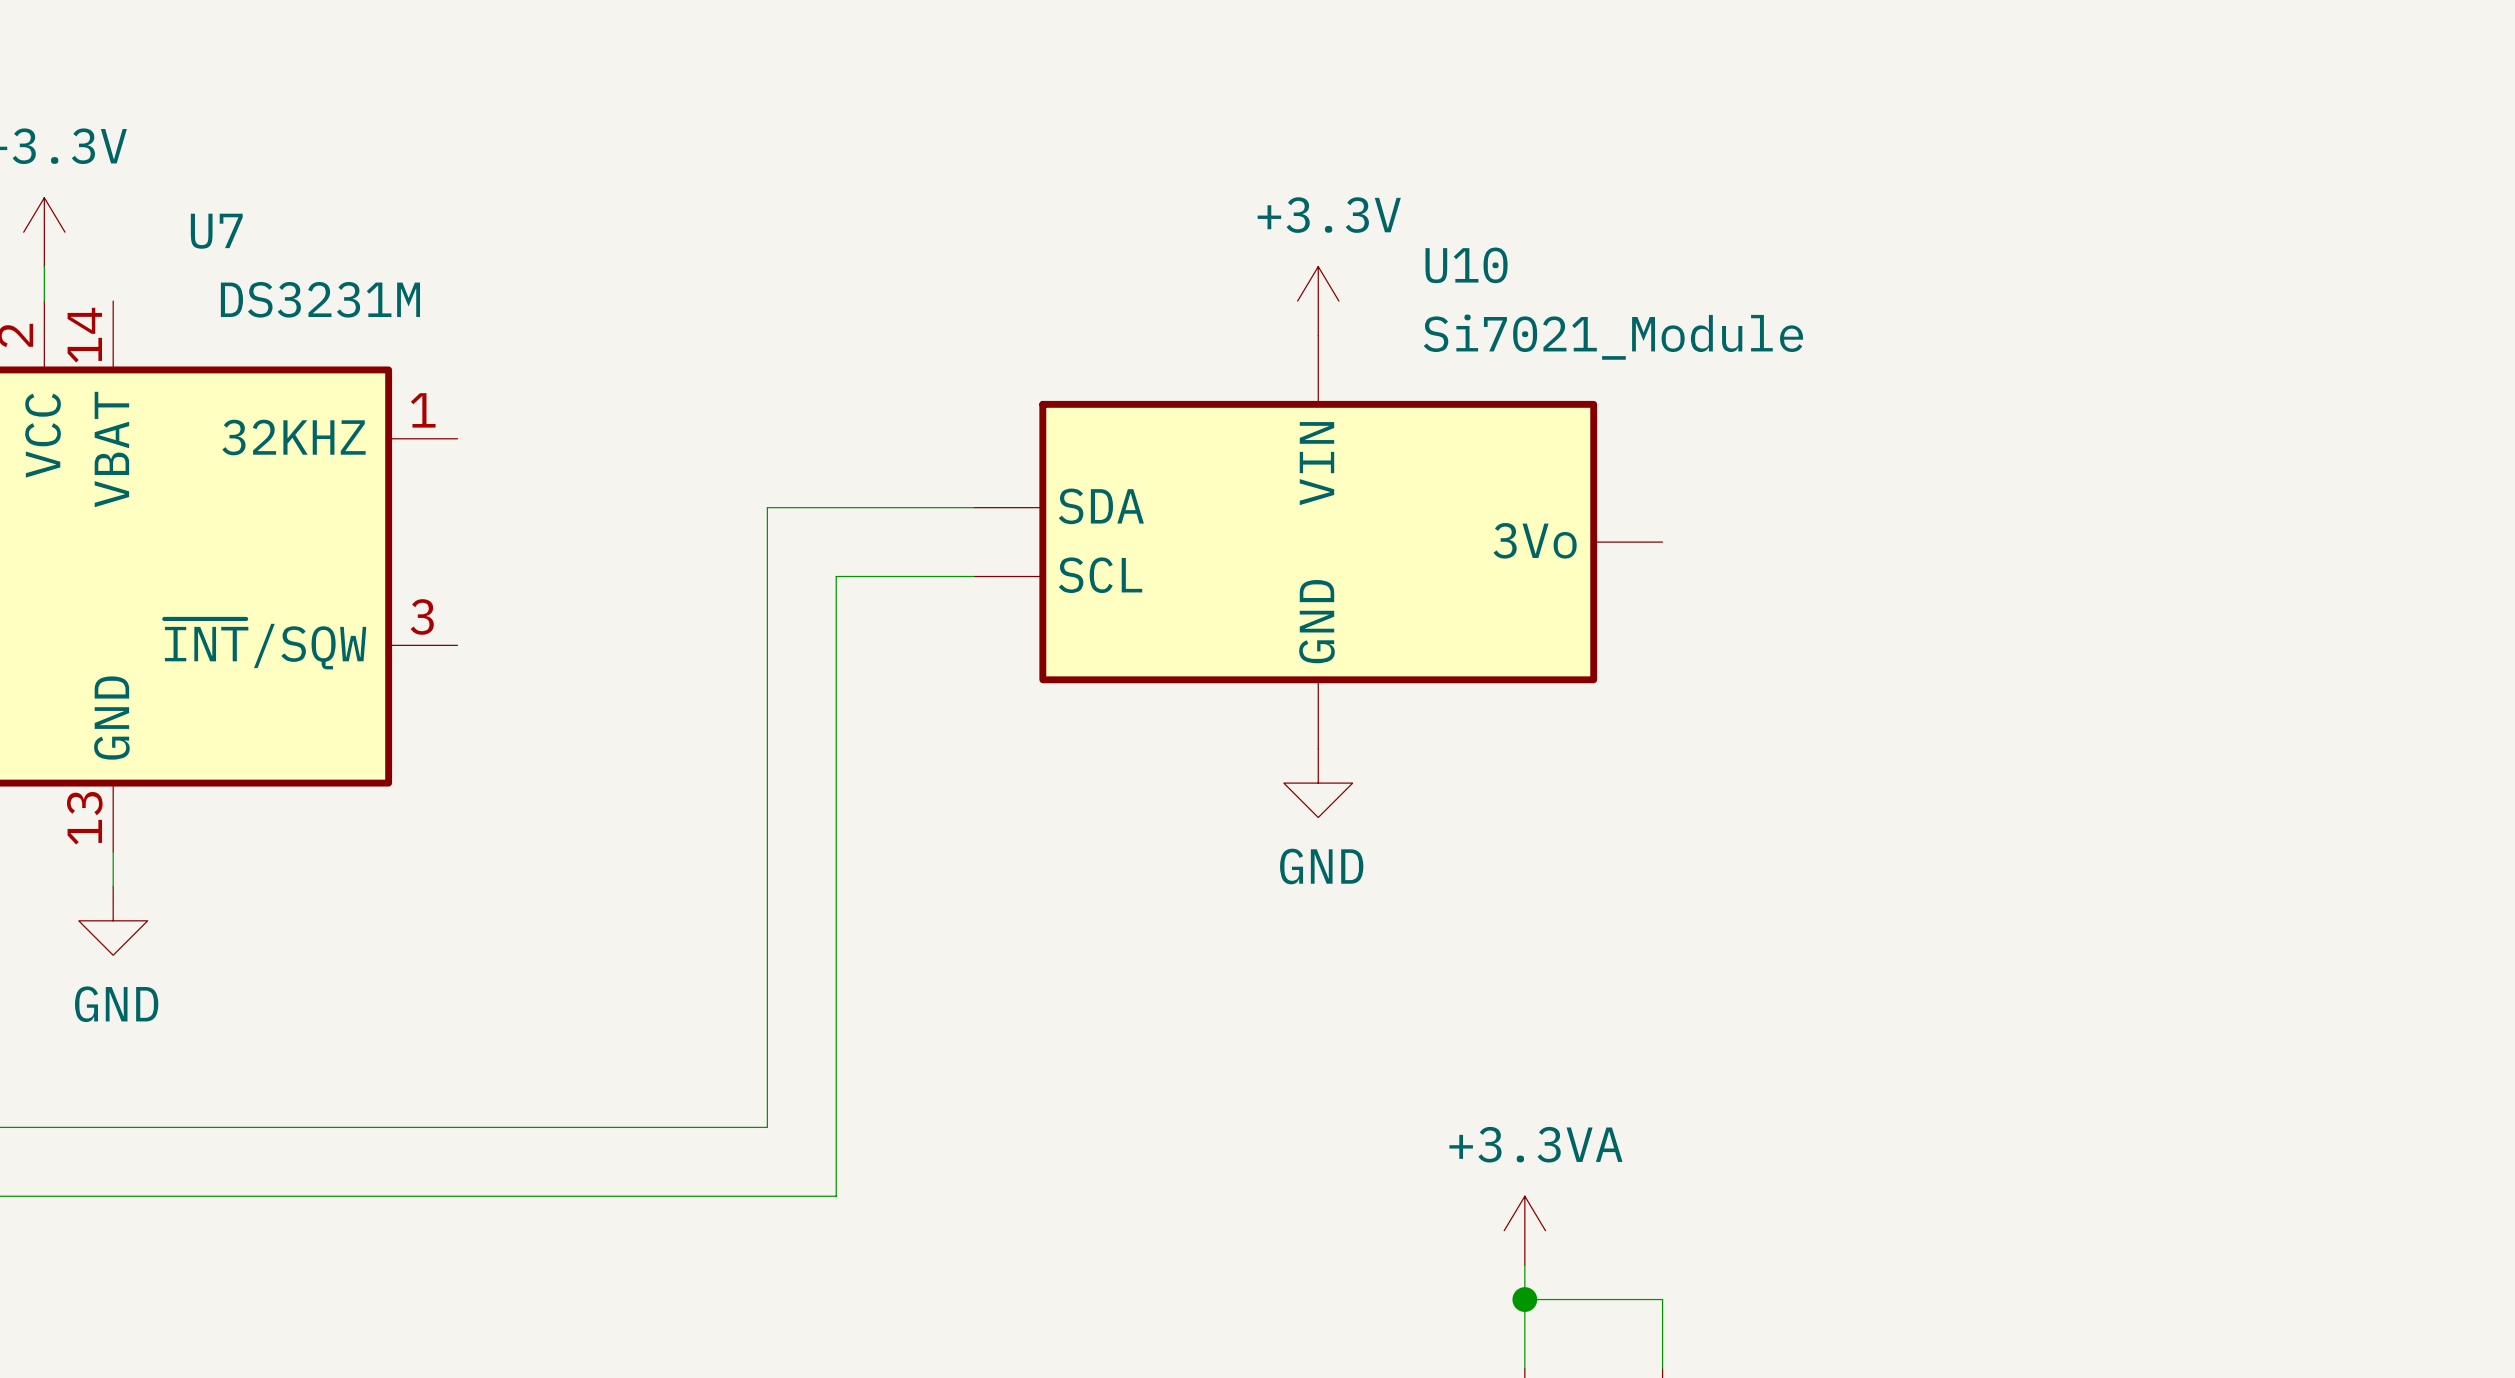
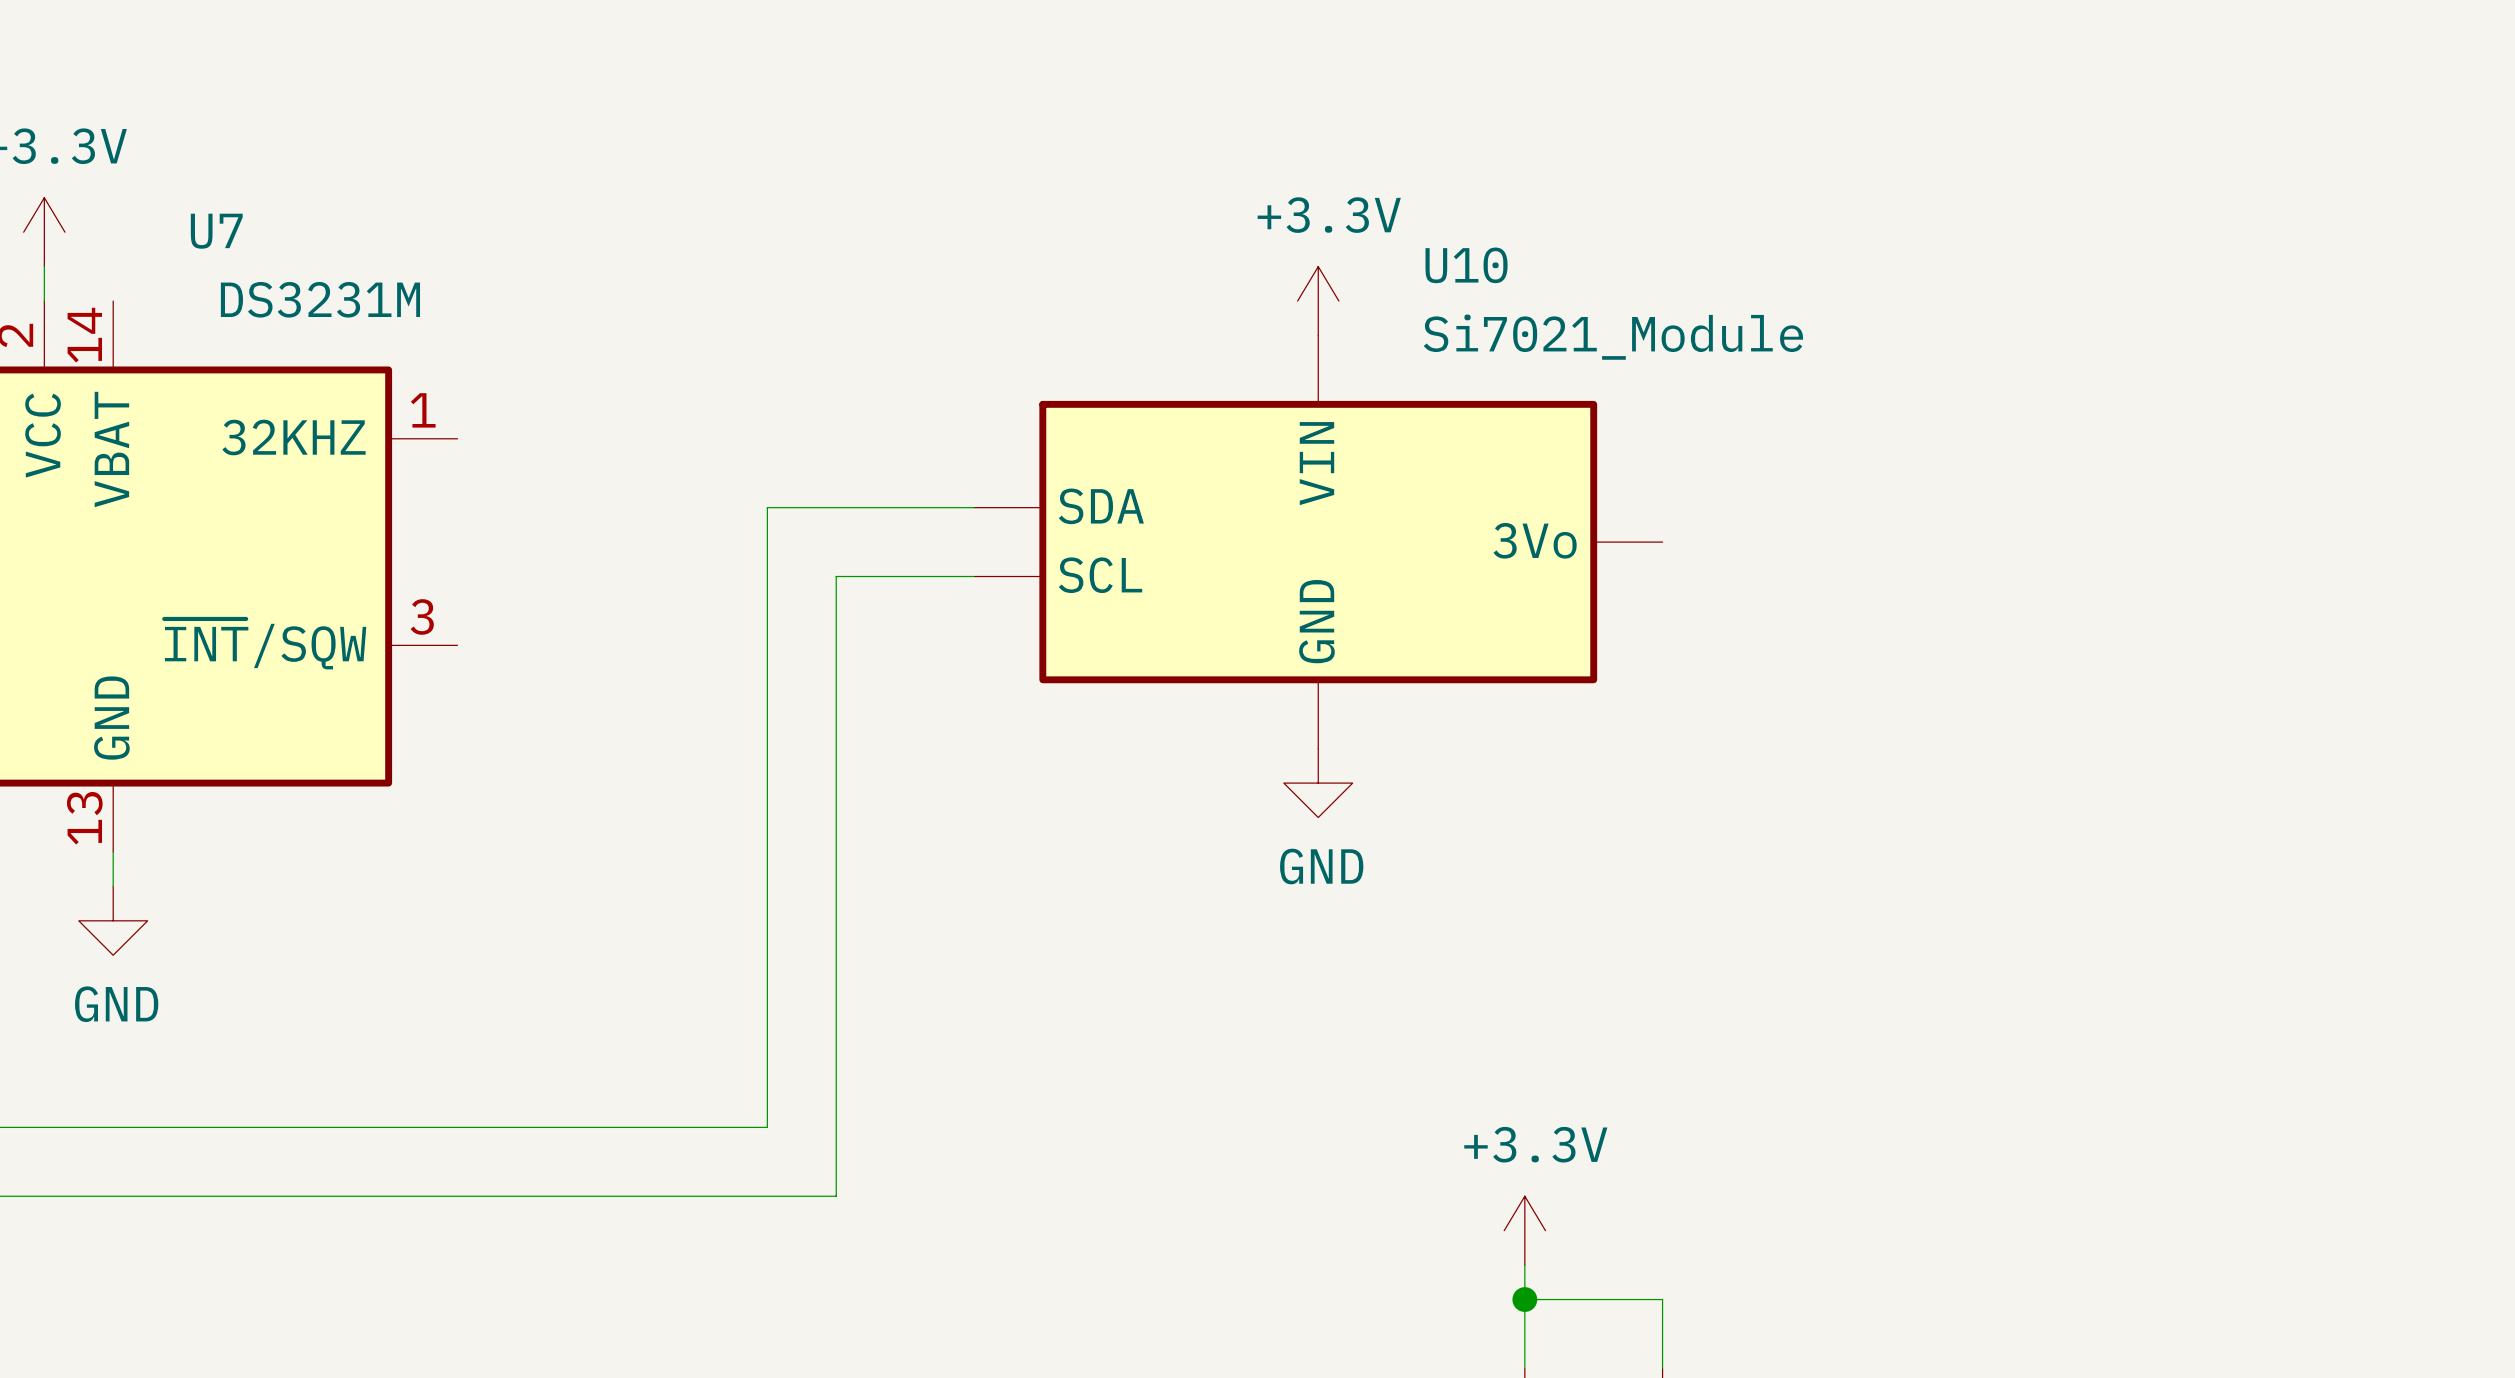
power symbol: +3.3VA (1524, 1230) -> +3.3V (1524, 1230)

